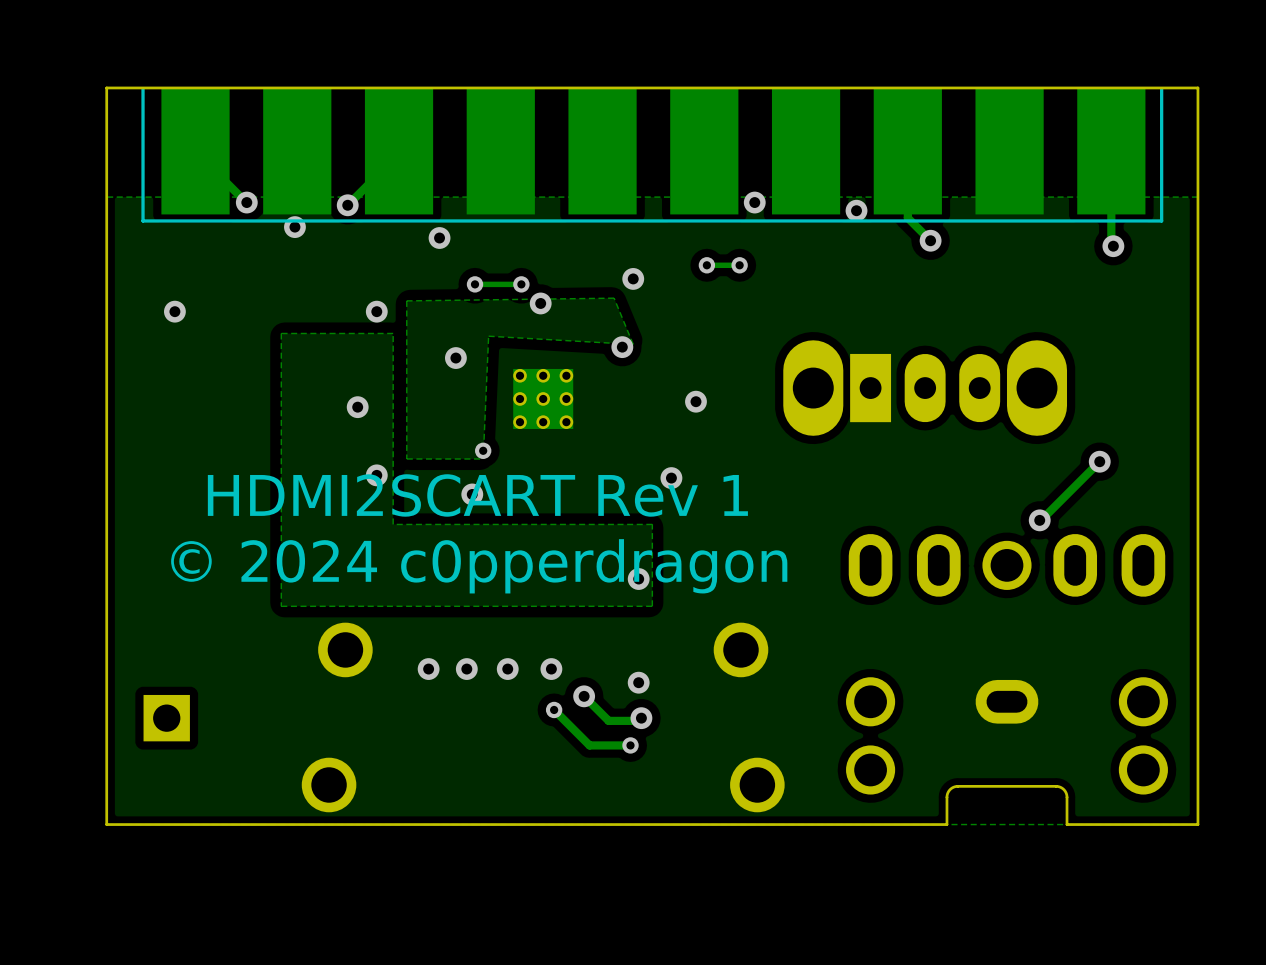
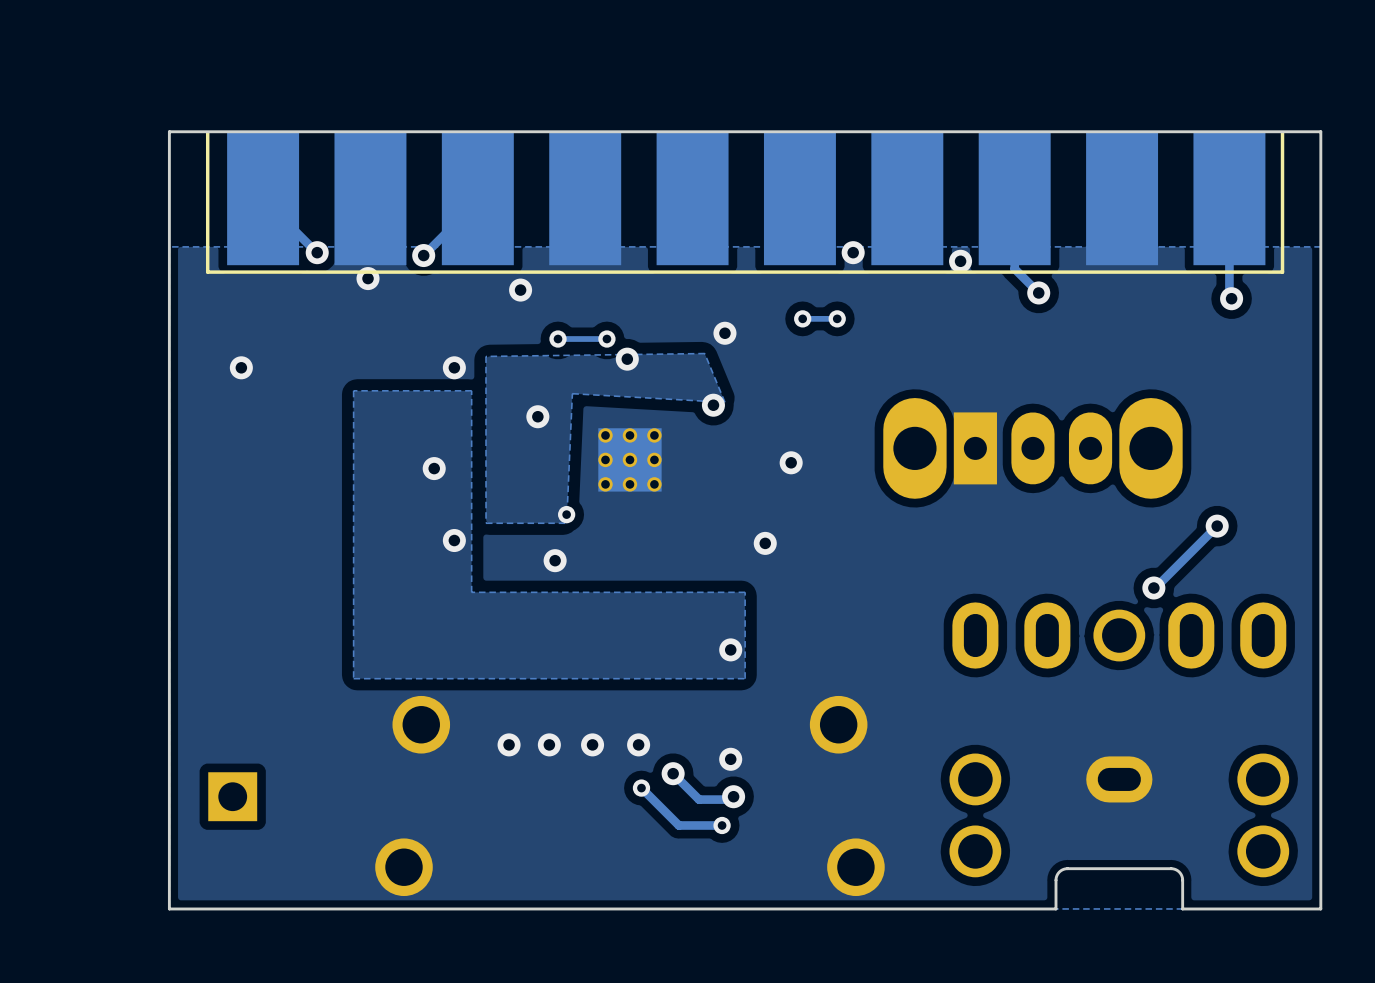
text: HDMI2SCART Rev 1 (477, 495) -> none
text: © 2024 c0pperdragon (479, 566) -> none

